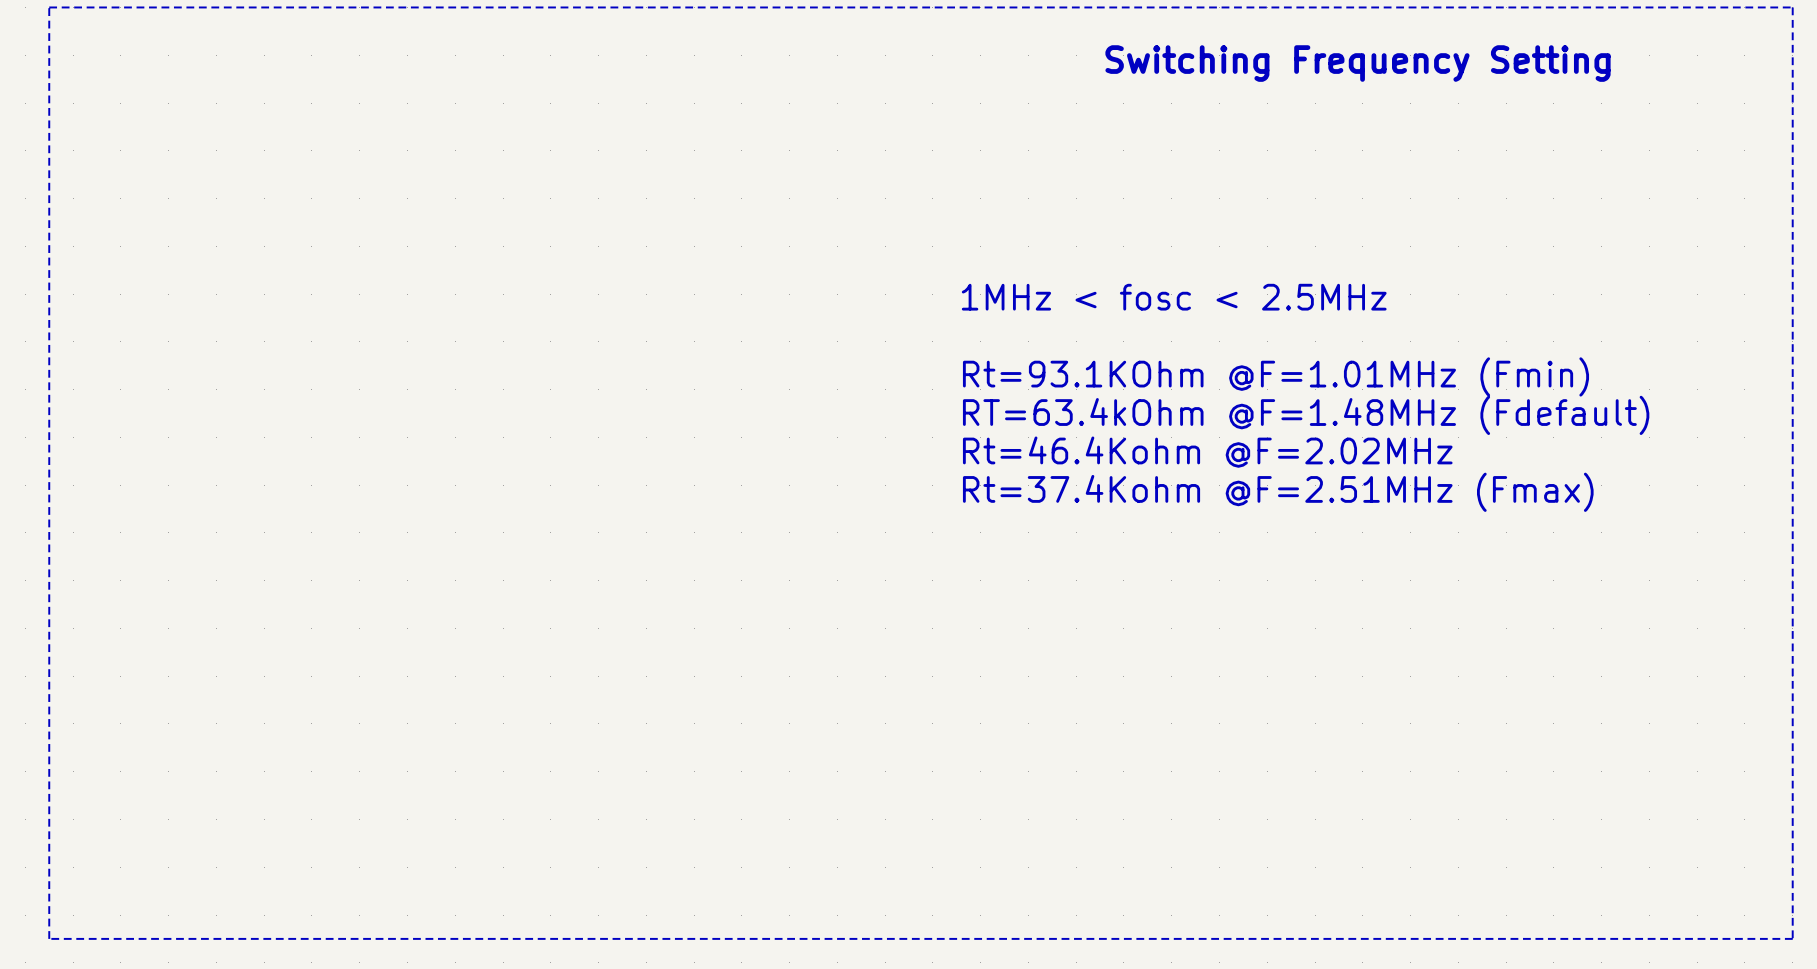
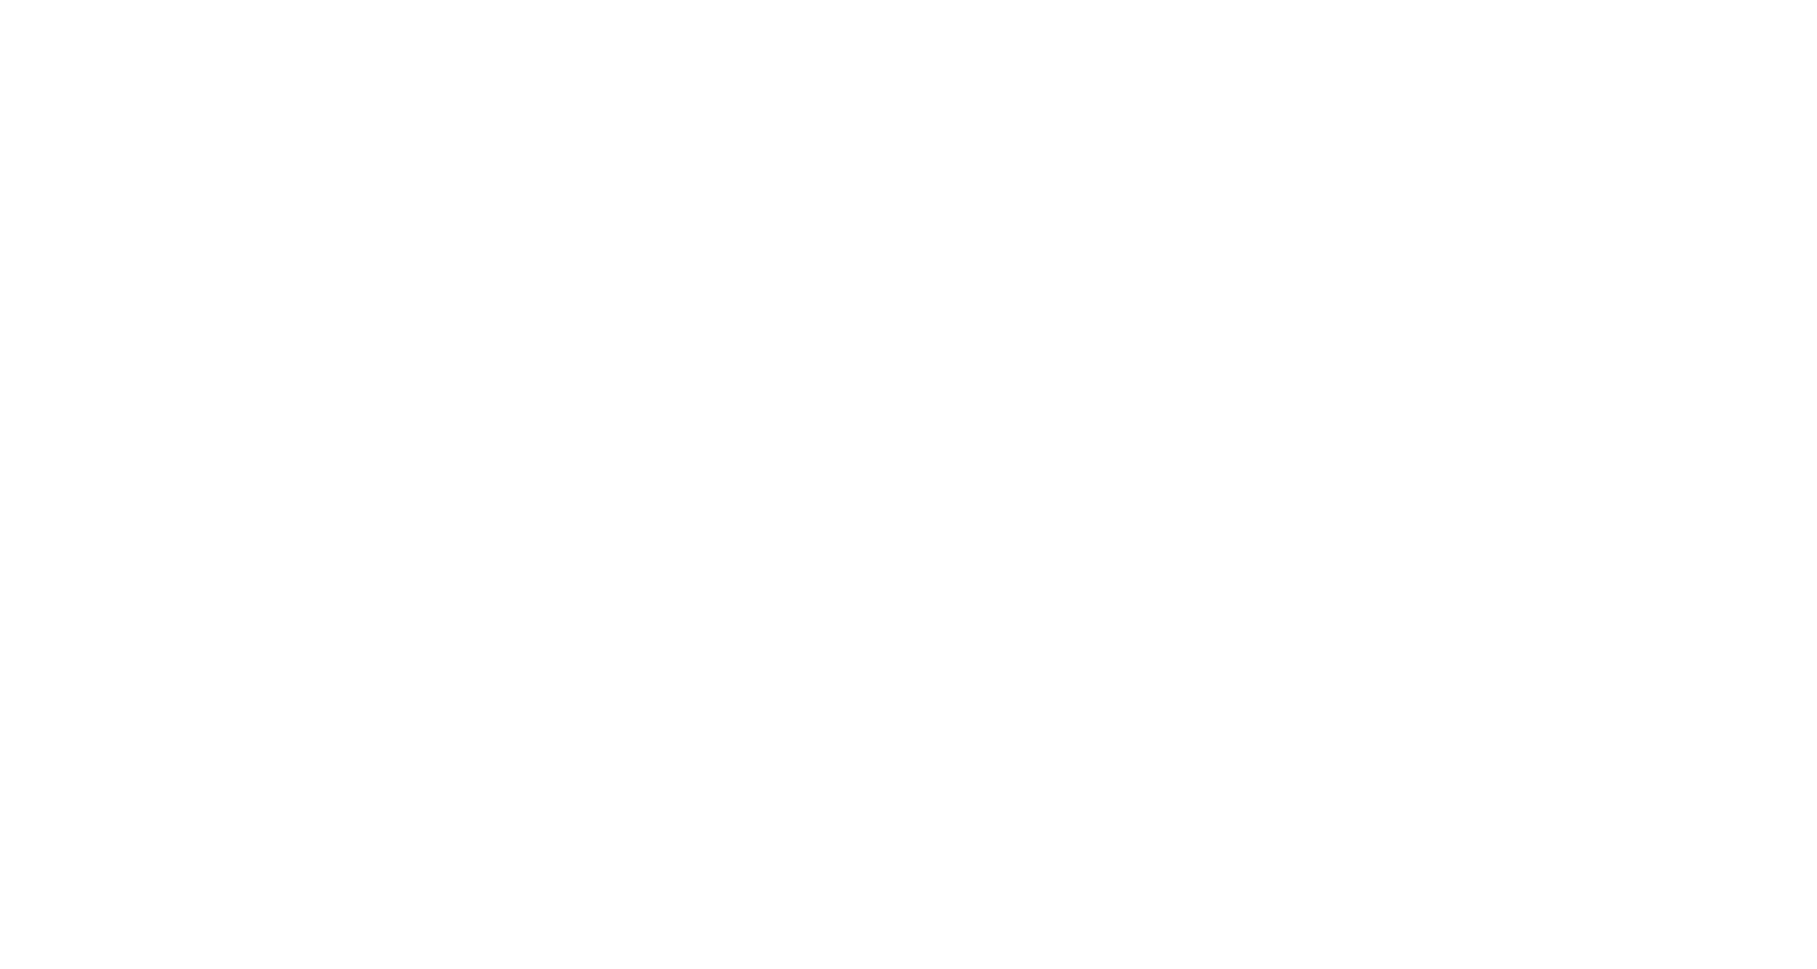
line: (49, 7) (1792, 7) (1792, 938) (49, 938) (49, 7) -> none
text: Switching Frequency Setting (1357, 63) -> none
text: 1MHz < fosc < 2.5MHz (1174, 297) -> none
text: Rt=93.1KOhm @F=1.01MHz (Fmin) (1275, 376) -> none
text: RT=63.4kOhm @F=1.48MHz (Fdefault) (1306, 415) -> none
text: Rt=46.4Kohm @F=2.02MHz (1207, 452) -> none
text: Rt=37.4Kohm @F=2.51MHz (Fmax) (1278, 492) -> none

